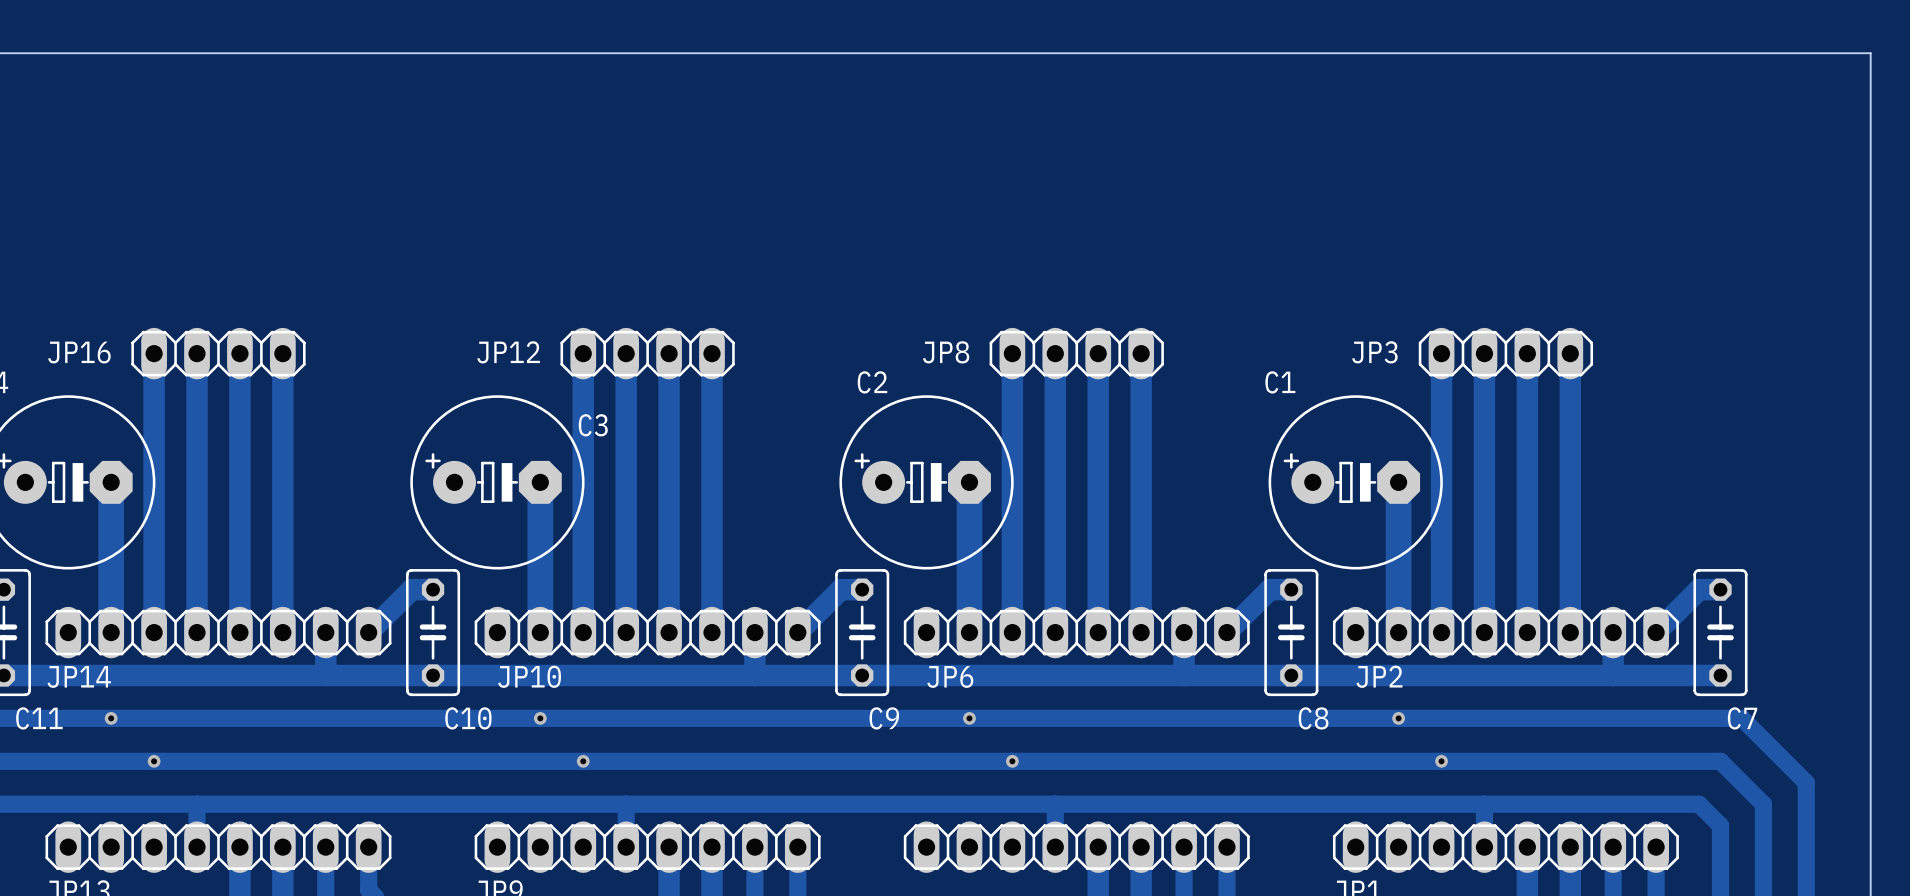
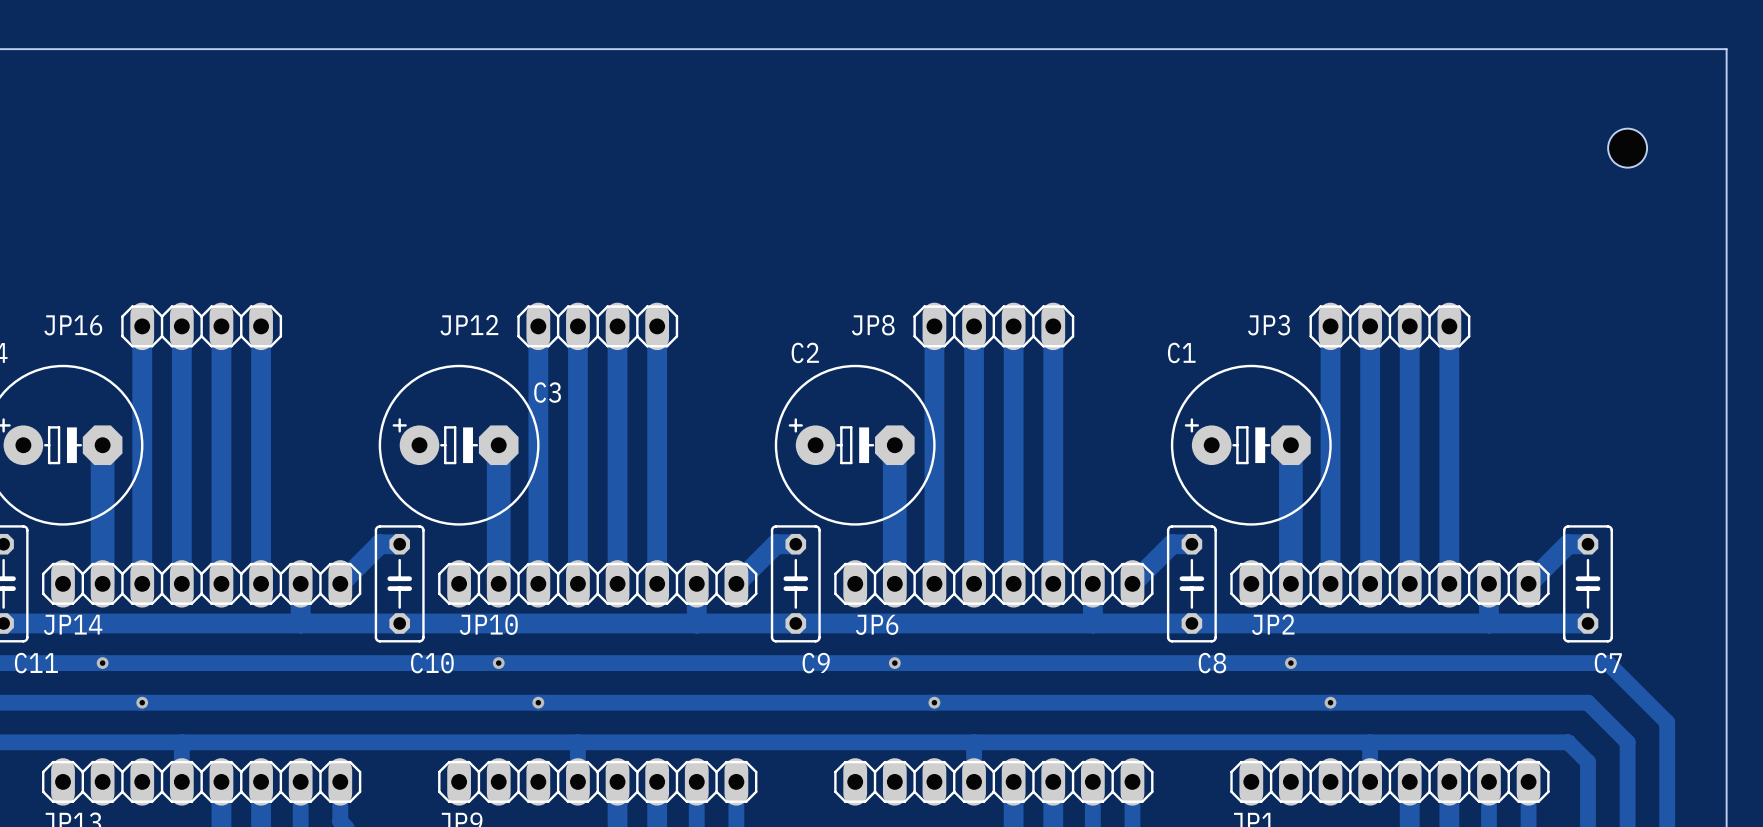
hole: none -> (1627, 148)

